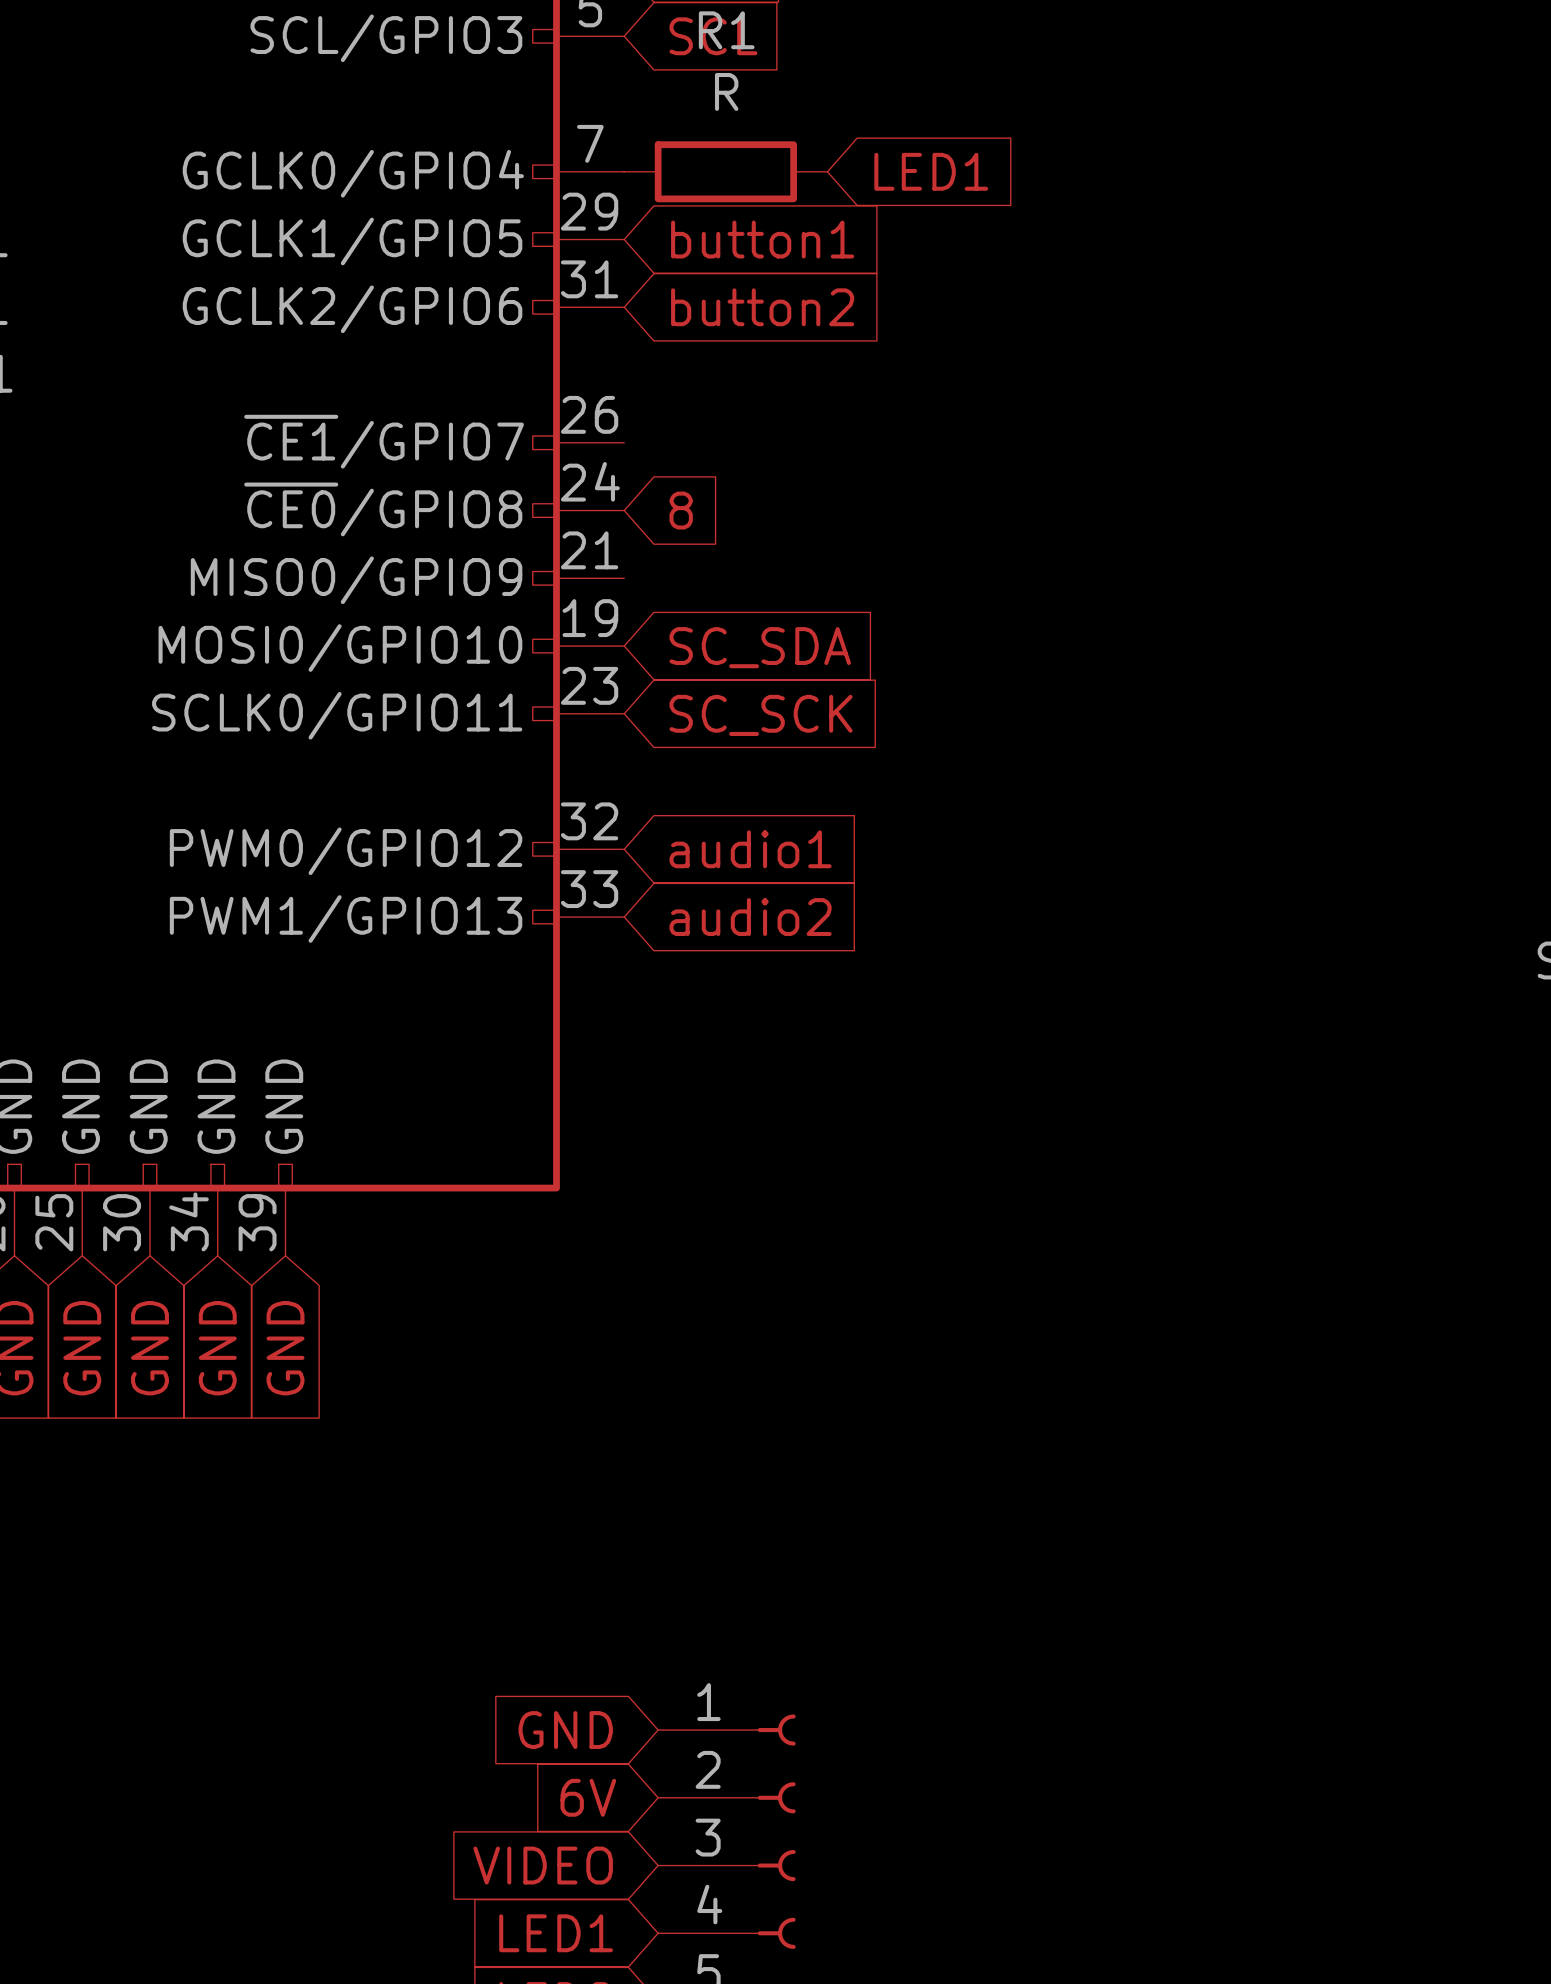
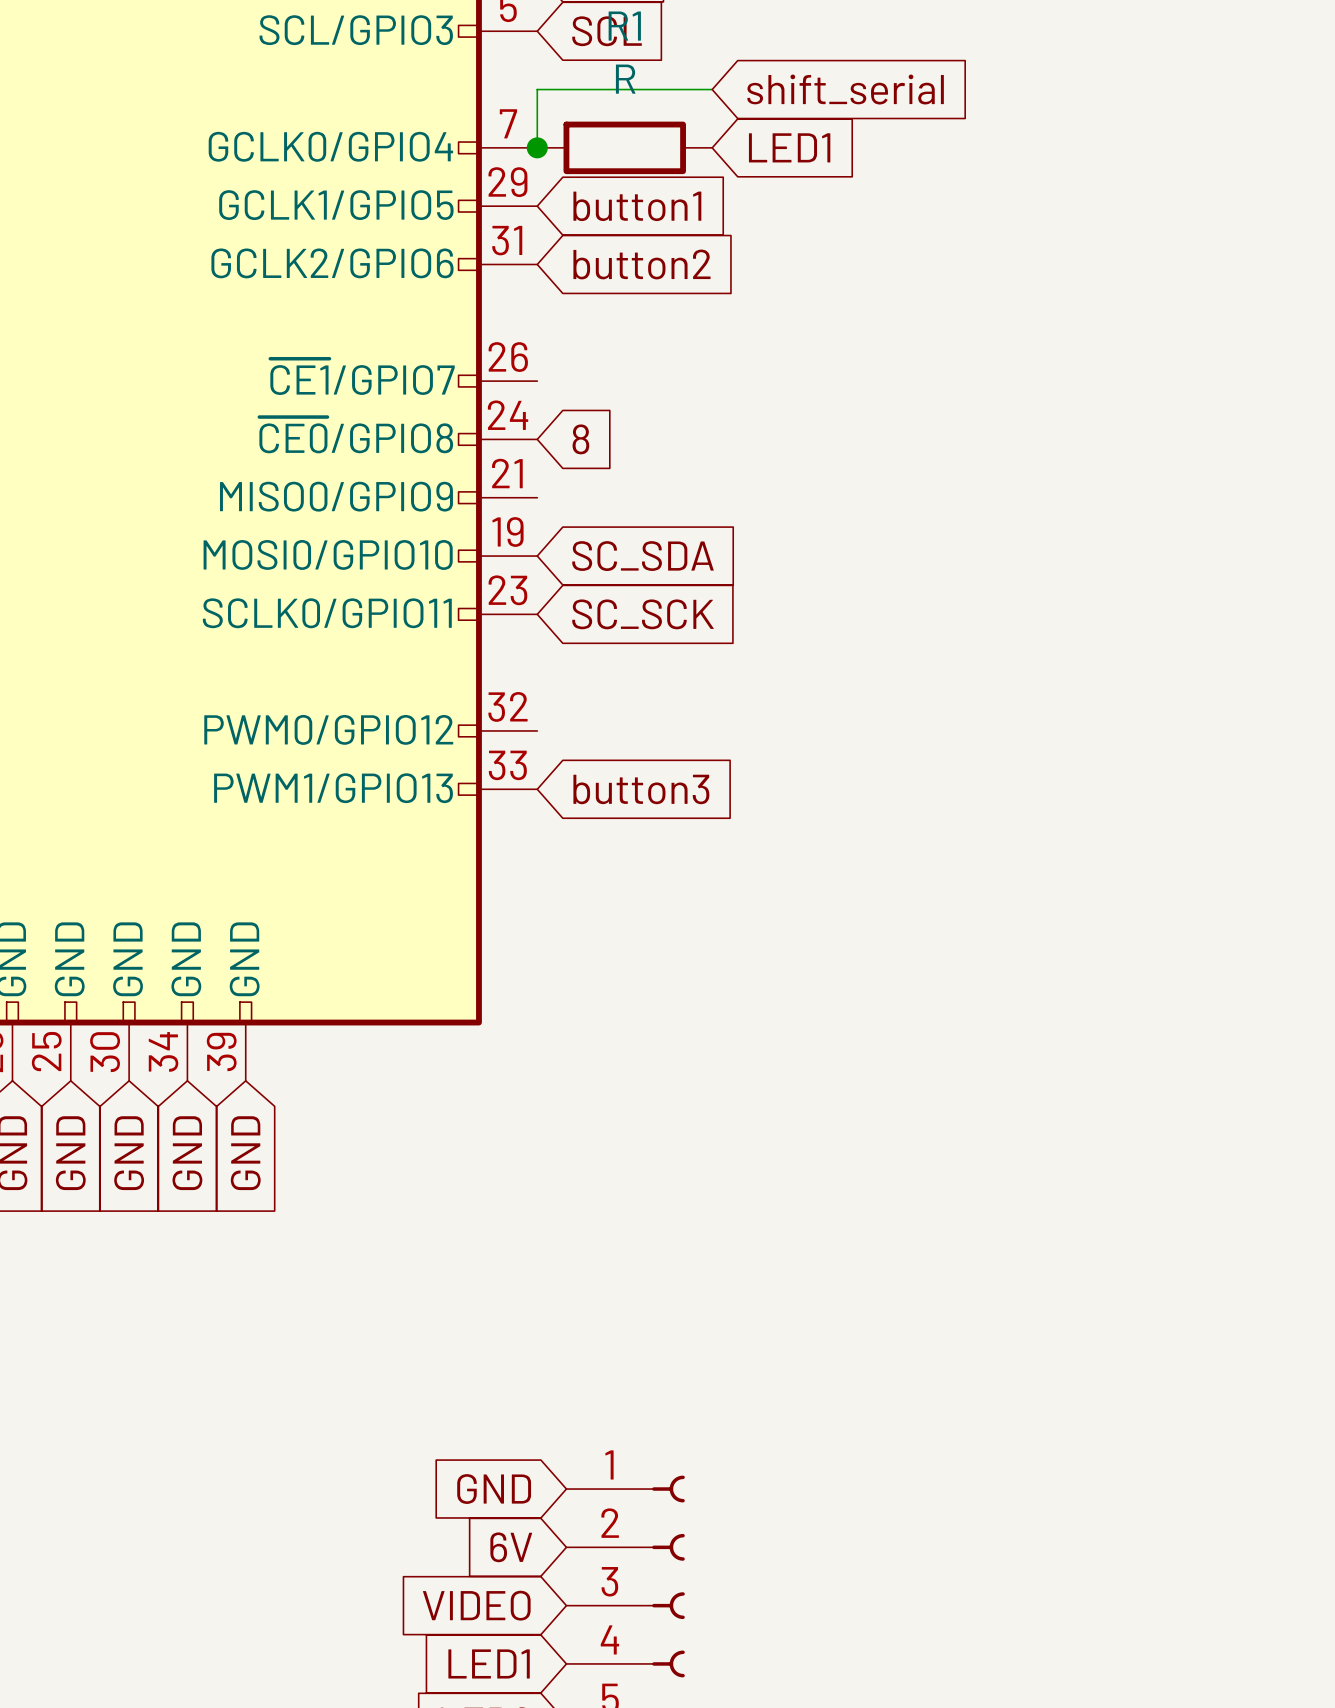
wire: none -> (712, 89) (537, 89) (537, 147)
global label: none -> shift_serial (845, 89)
junction: none -> (537, 147)
global label: audio1 (750, 849) -> none
global label: audio2 (750, 917) -> button3 (641, 789)

